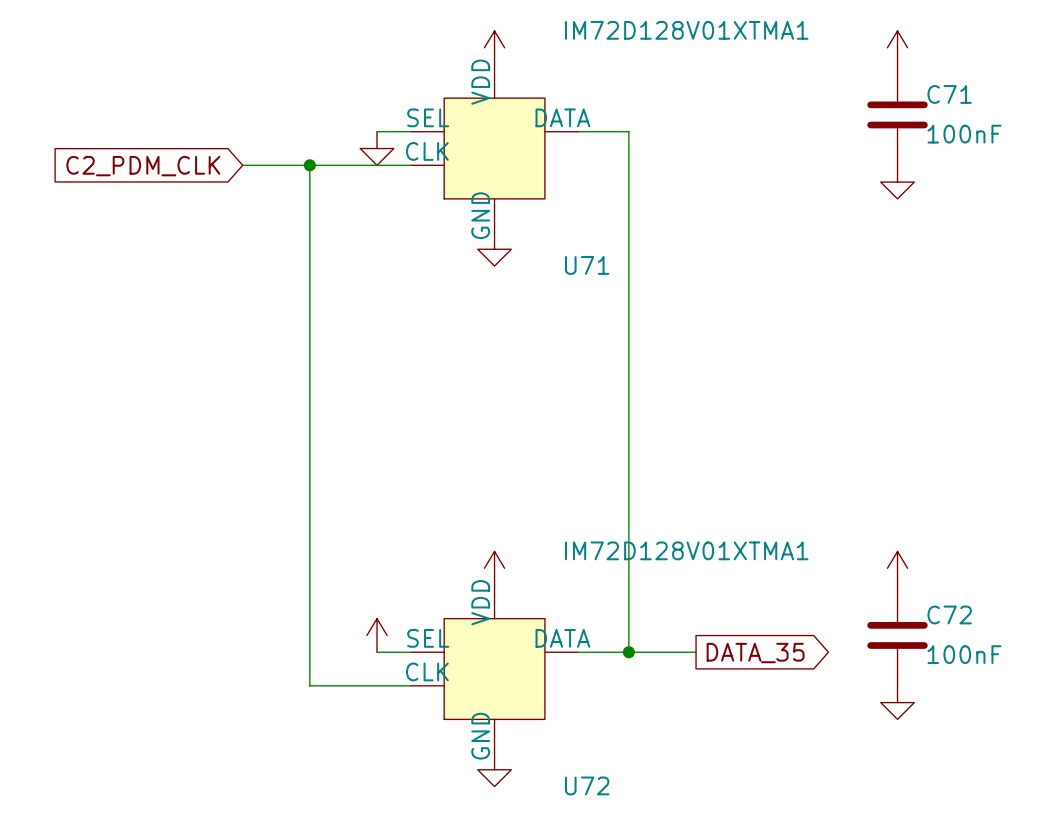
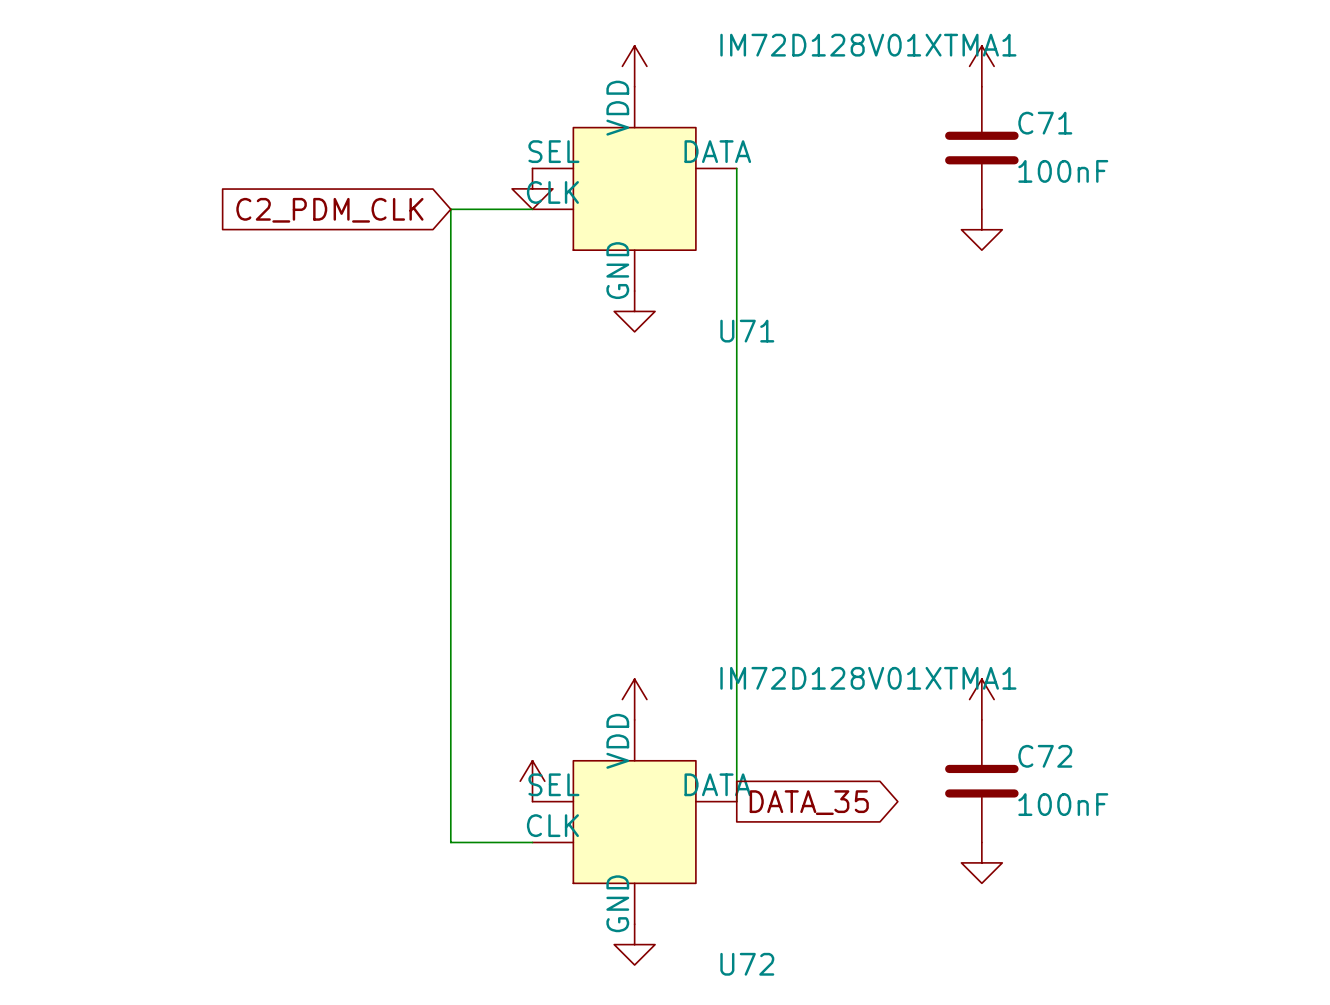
power symbol position: (897, 47) -> (981, 66)
C71 position: (897, 114) -> (981, 148)
wire: (377, 131) (410, 131) -> none
wire: (578, 131) (628, 131) (628, 652) -> (736, 168) (736, 801)
power symbol position: (377, 148) -> (532, 188)
wire: (242, 165) (343, 165) -> none
wire: (309, 165) (309, 685) (343, 685) -> (450, 209) (450, 842)
junction: (309, 165) -> none
global label position: C2_PDM_CLK (143, 166) -> C2_PDM_CLK (329, 210)
power symbol position: (897, 182) -> (981, 229)
power symbol position: (897, 568) -> (981, 699)
power symbol position: (377, 635) -> (532, 781)
C72 position: (897, 635) -> (981, 781)
wire: (377, 652) (410, 652) -> none
wire: (578, 652) (696, 652) -> none
junction: (628, 652) -> none
global label position: DATA_35 (755, 653) -> DATA_35 (809, 802)
power symbol position: (897, 702) -> (981, 862)

